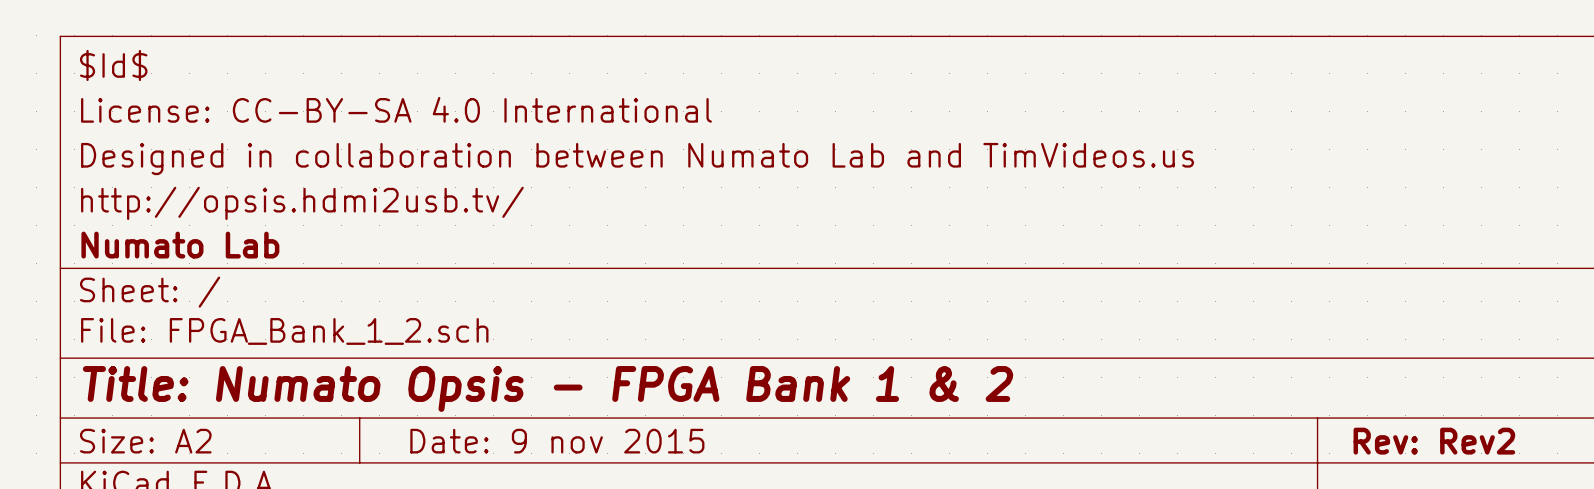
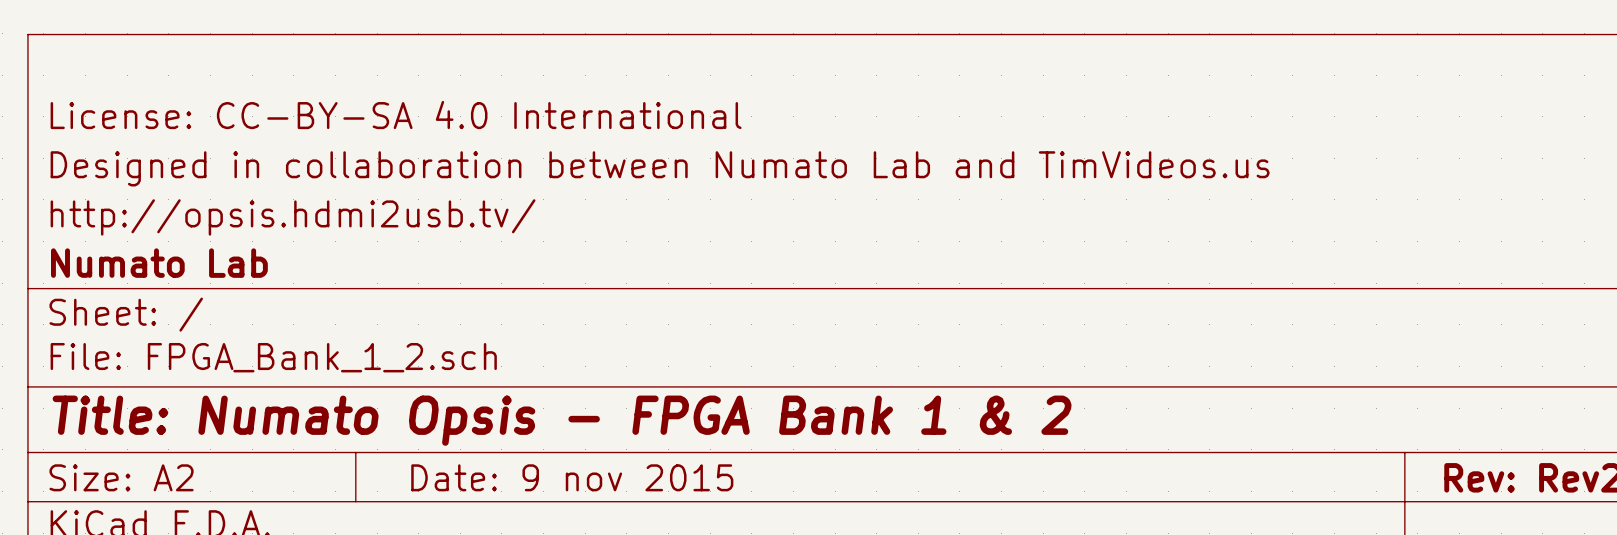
title block: $Id$ (113, 65) -> none

